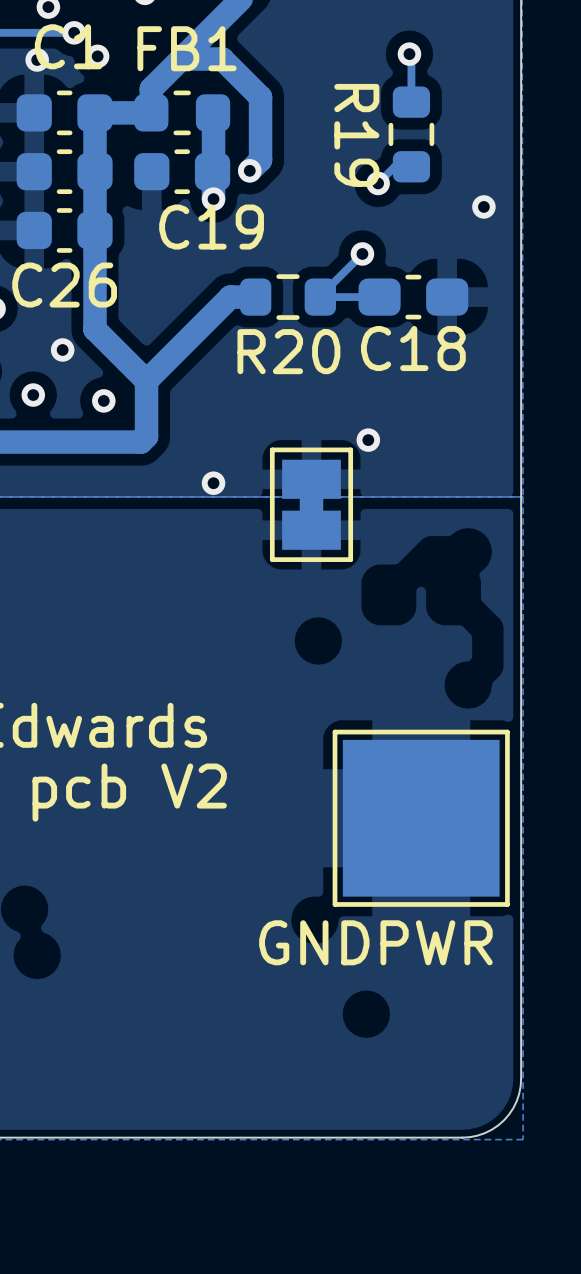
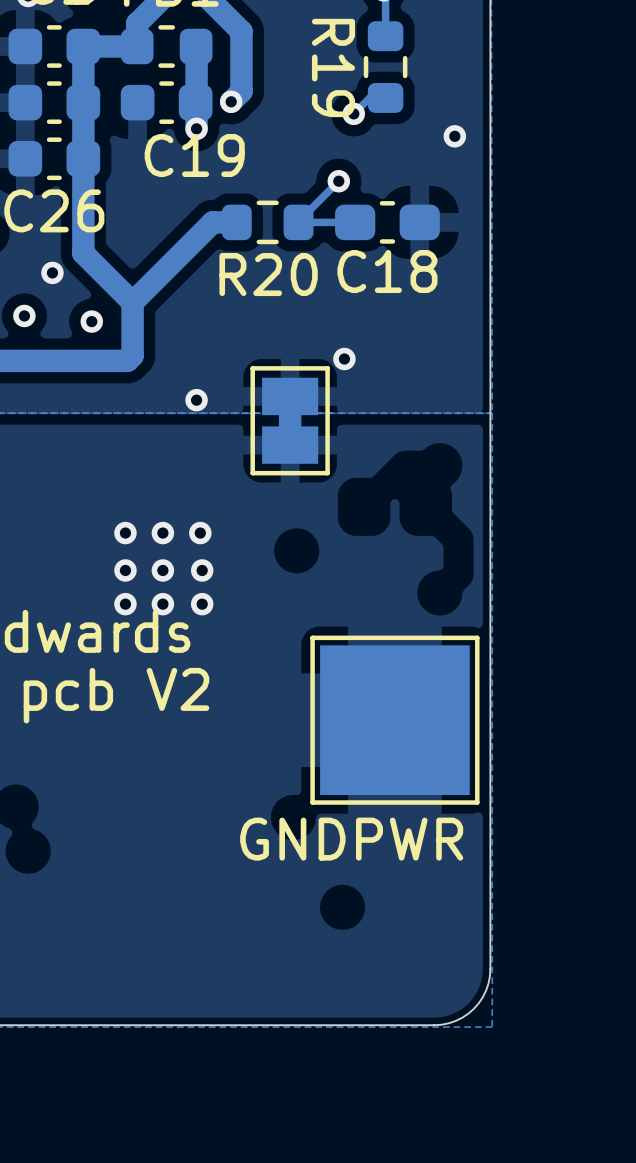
via: none -> (125, 533)
via: none -> (162, 533)
via: none -> (200, 533)
via: none -> (125, 570)
via: none -> (162, 570)
via: none -> (202, 570)
via: none -> (125, 604)
via: none -> (162, 604)
via: none -> (202, 604)

